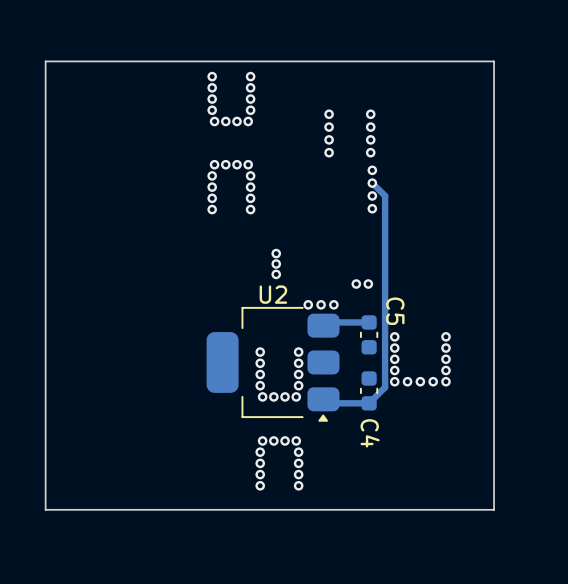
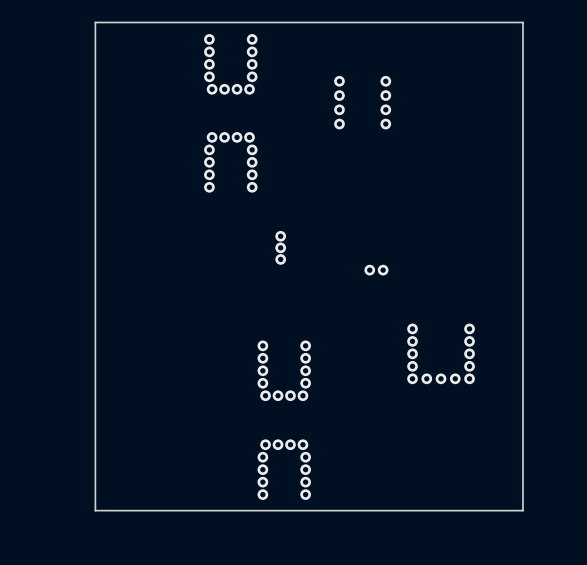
board edge: (109, 61) (45, 61) (45, 509) (494, 509) (494, 500) -> (95, 22) (95, 510) (522, 510)
via: (372, 170) -> none
track: (372, 183) (385, 195) (385, 387) (369, 403) (327, 403) (323, 399) -> none
via: (372, 183) -> none
via: (372, 195) -> none
via: (372, 208) -> none
via: (308, 304) -> none
via: (321, 304) -> none
via: (333, 304) -> none
track: (369, 322) (326, 322) (323, 325) -> none
C5: (369, 334) -> none
U2: (273, 364) -> none
C4: (369, 390) -> none

